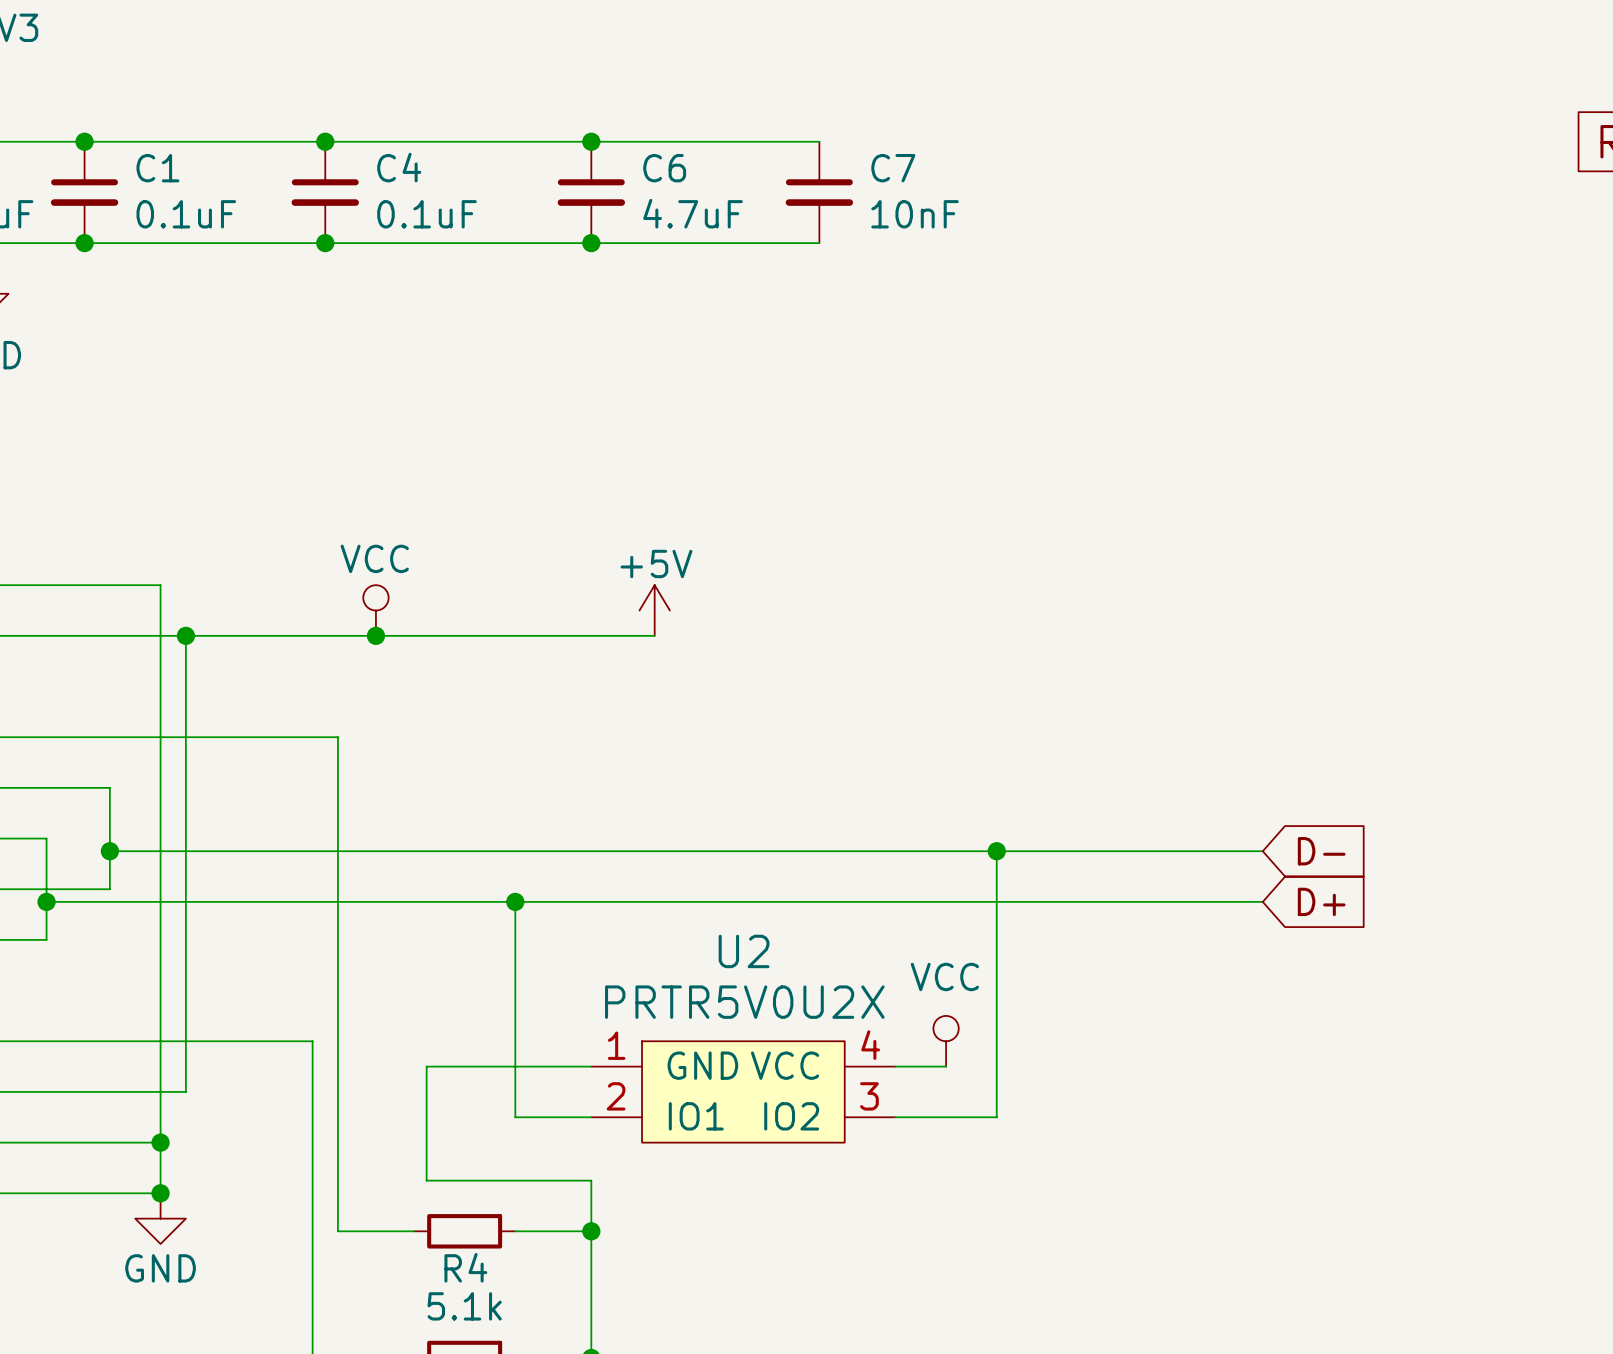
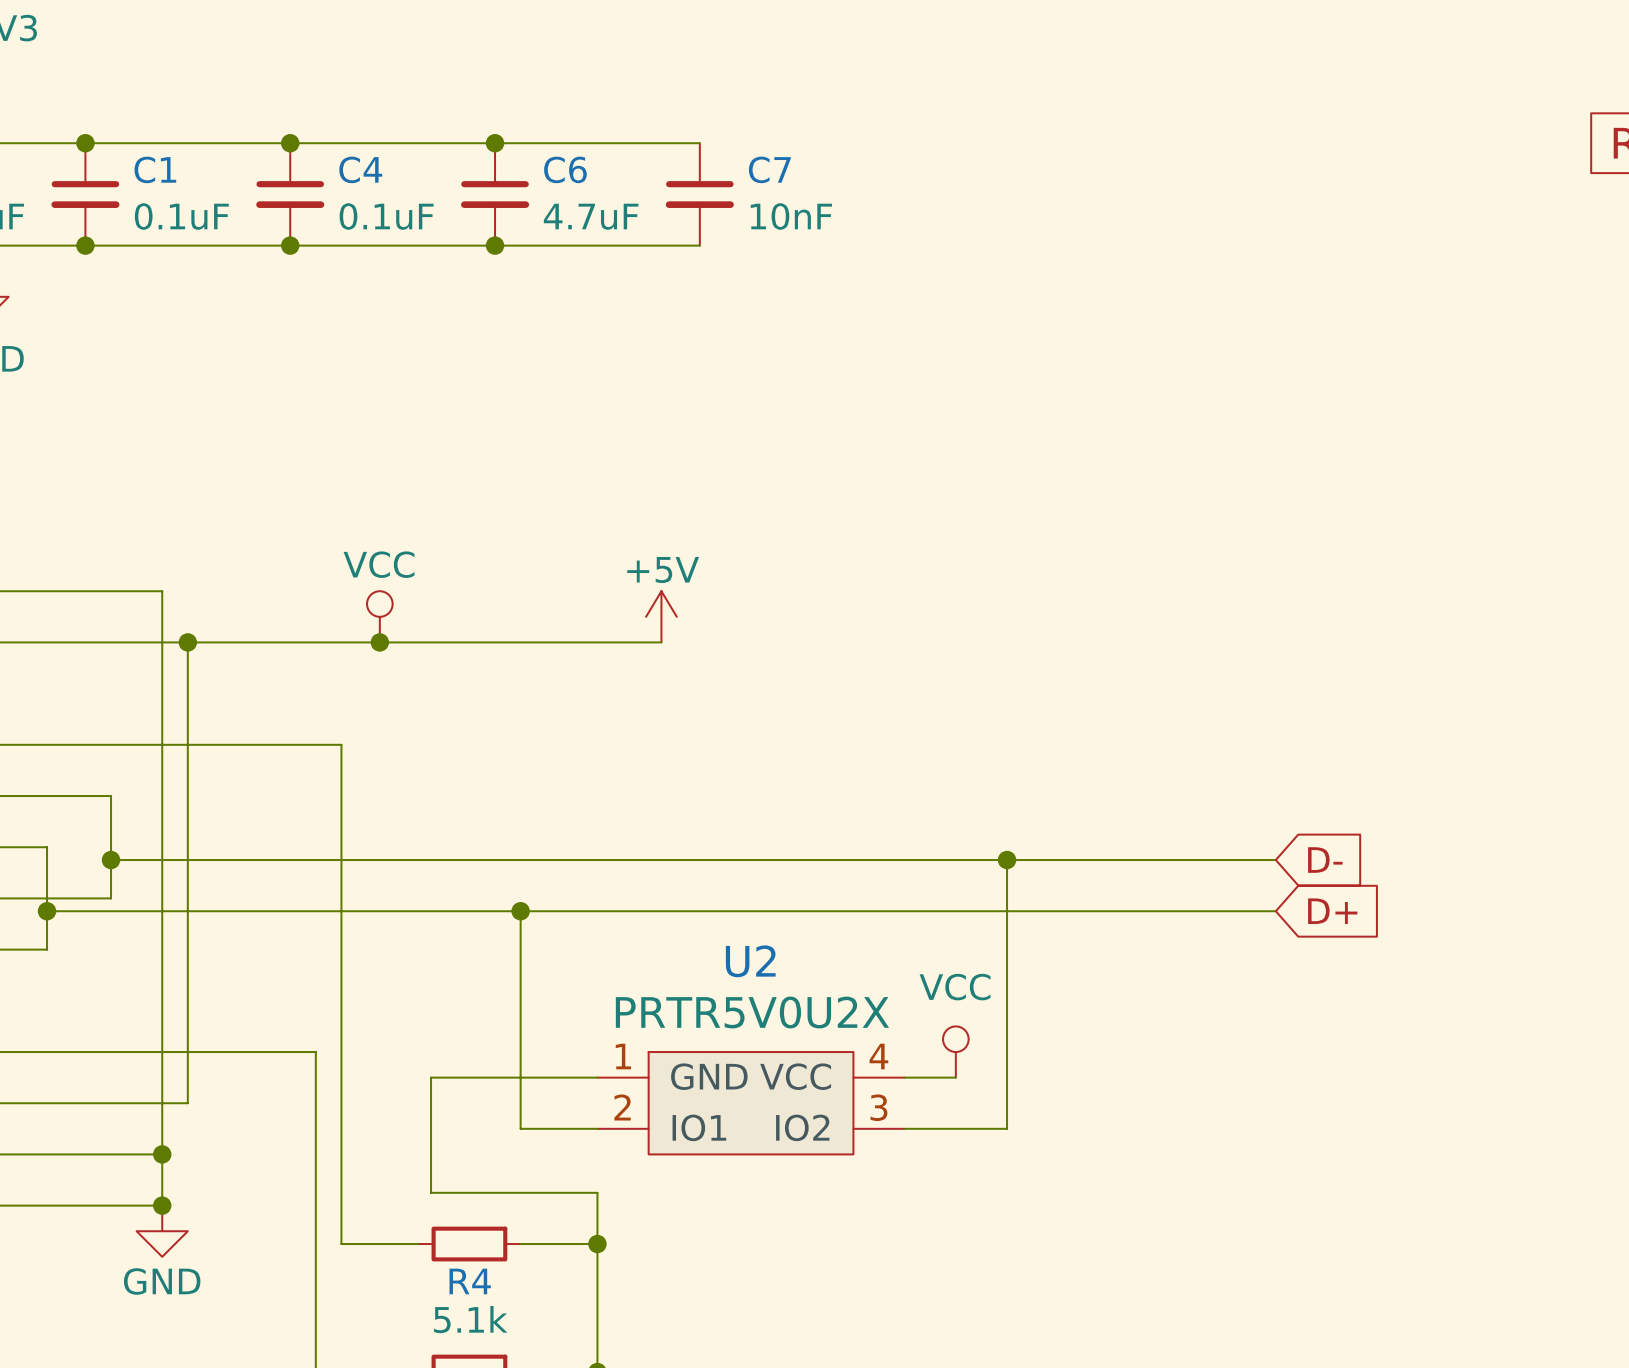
junction position: (325, 141) -> (290, 143)
junction: none -> (495, 143)
junction: (591, 141) -> none
wire: (692, 141) (819, 141) -> none
C4 position: (325, 192) -> (290, 194)
C6 position: (591, 192) -> (495, 194)
C7 position: (819, 192) -> (699, 194)
junction position: (325, 243) -> (290, 245)
junction: none -> (495, 245)
junction: (591, 243) -> none
wire: (692, 243) (819, 243) -> none

